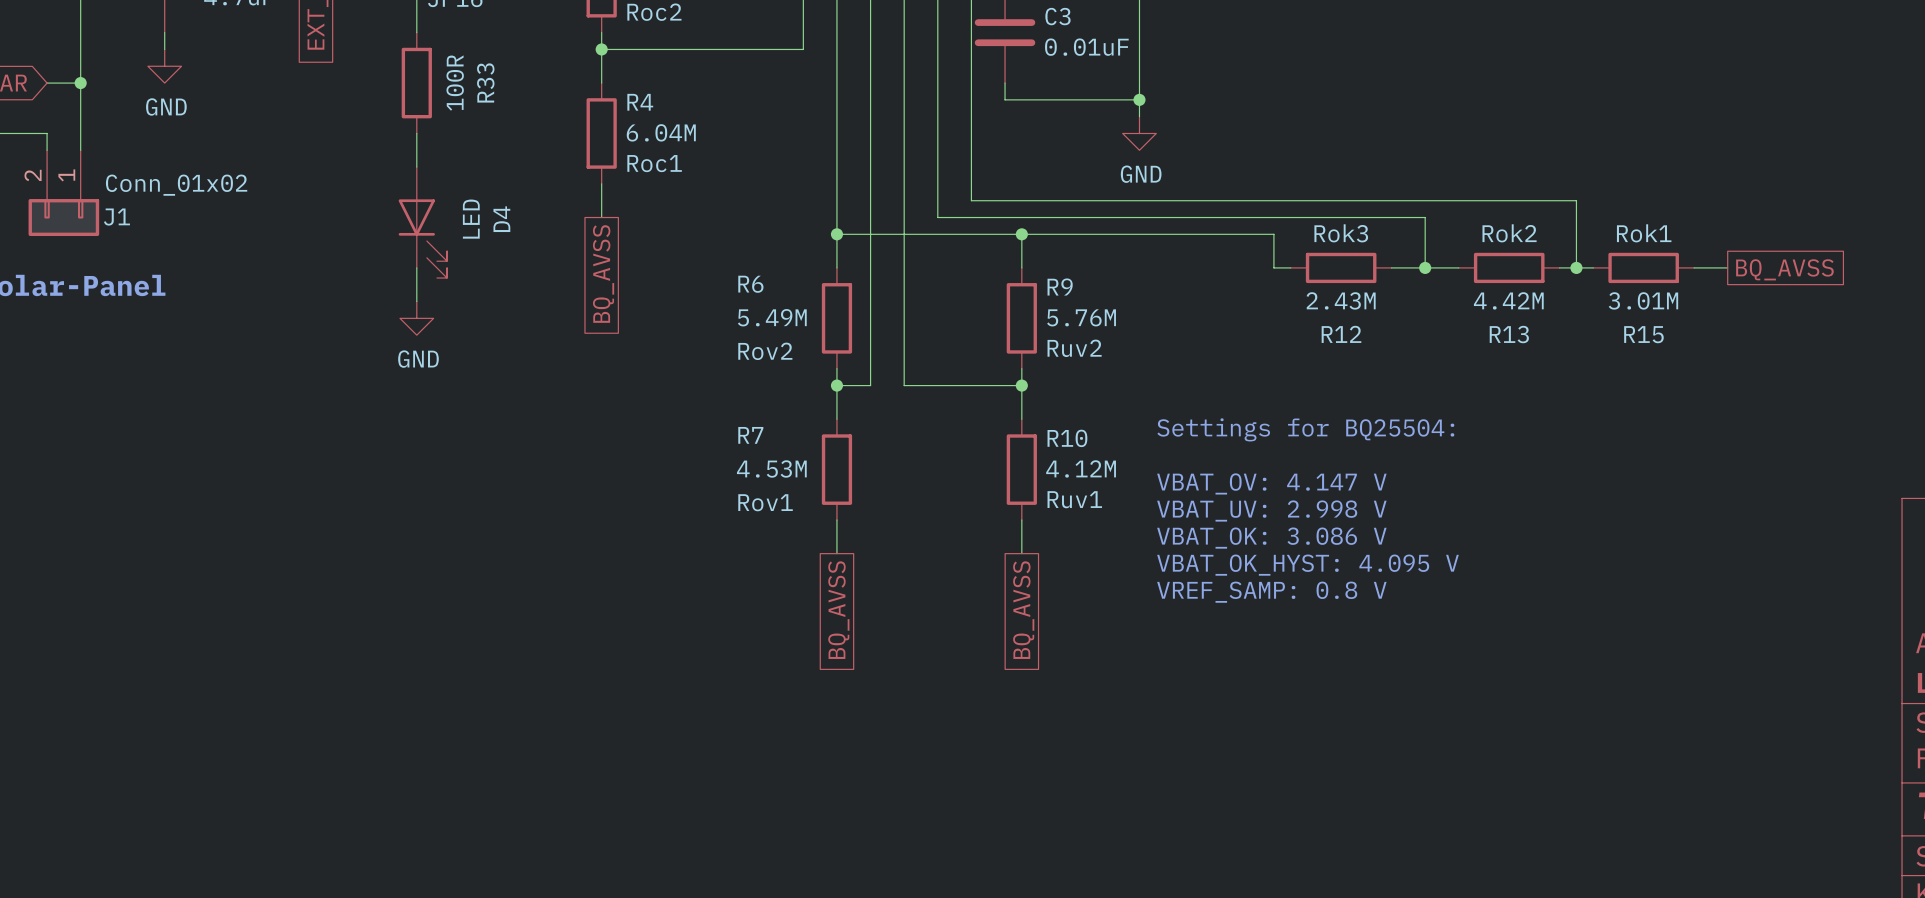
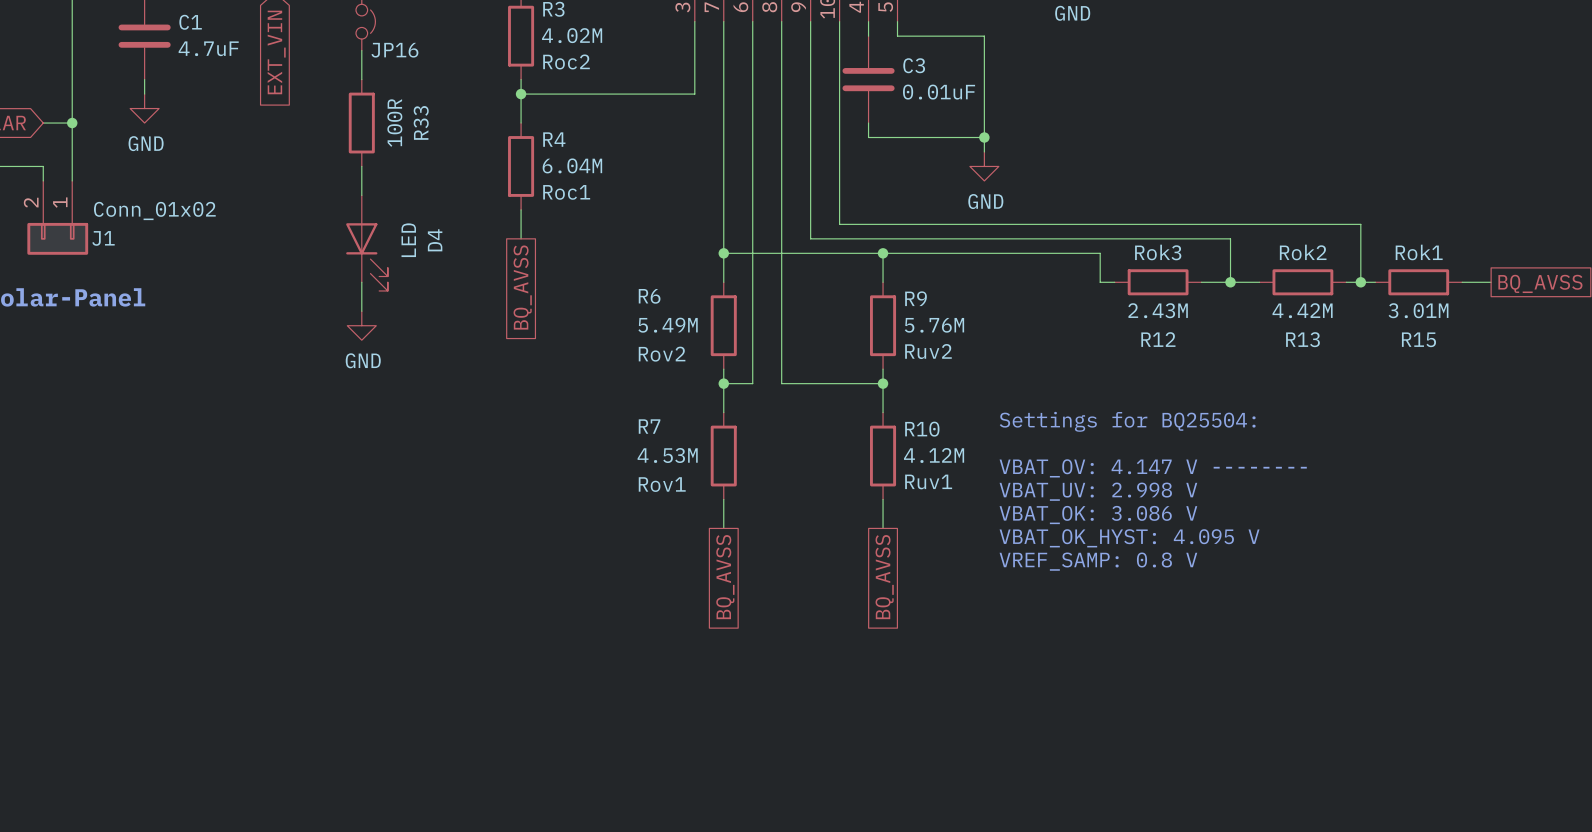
text: VBAT_OV: 4.147 V (1271, 483) -> VBAT_OV: 4.147 V -------- (1153, 468)

